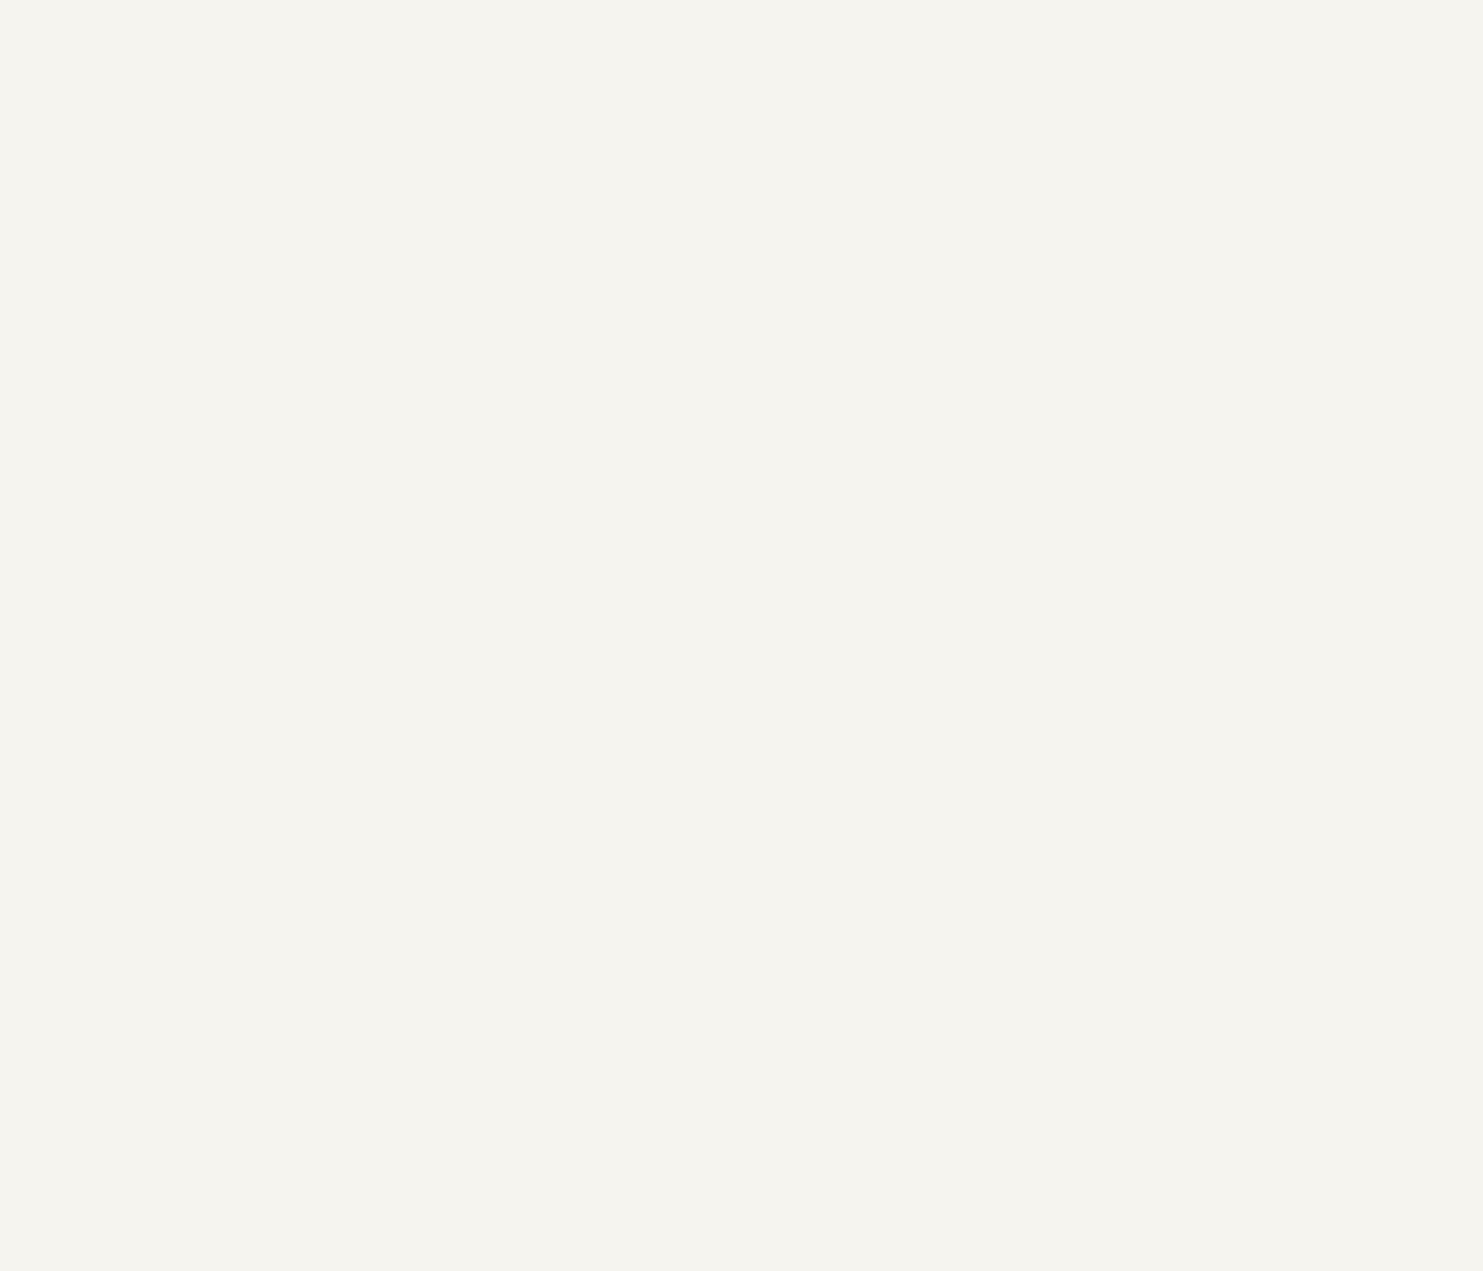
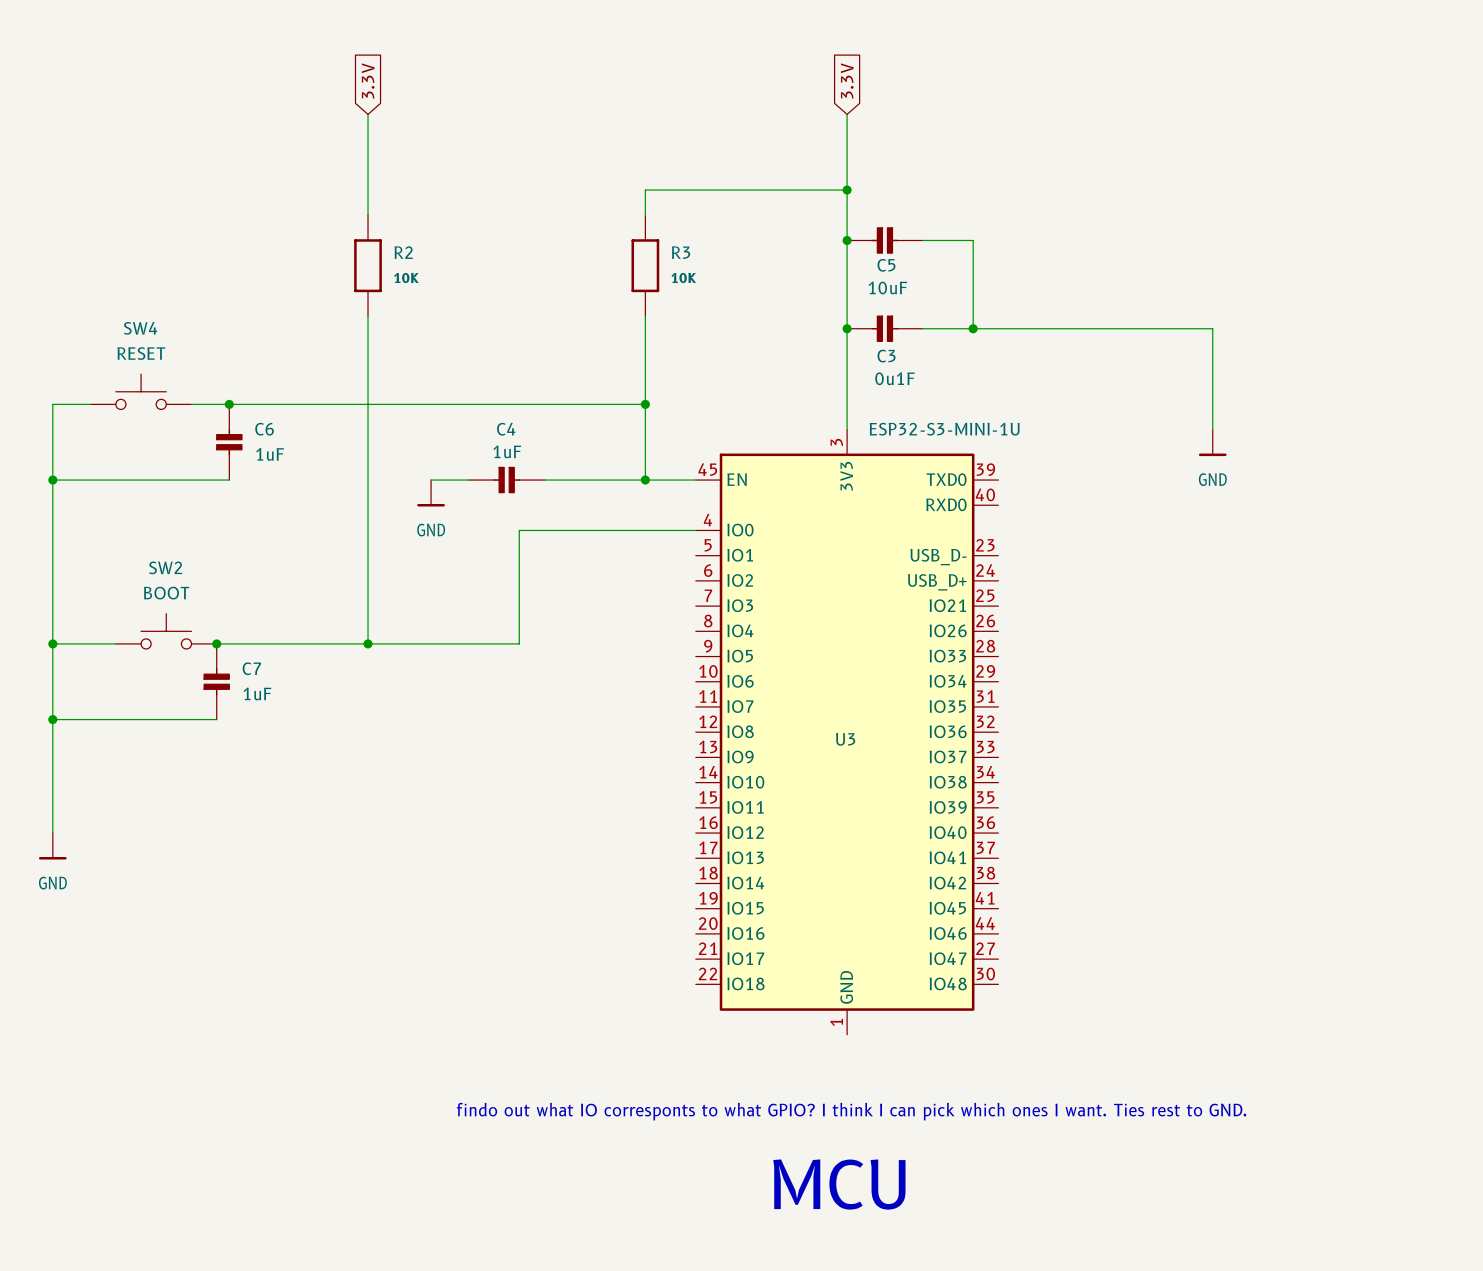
global label: none -> 3.3V (368, 80)
global label: none -> 3.3V (847, 80)
wire: none -> (368, 114) (368, 215)
wire: none -> (847, 114) (847, 429)
wire: none -> (847, 190) (645, 190) (645, 215)
junction: none -> (847, 190)
junction: none -> (847, 240)
C5: none -> 10uF (884, 240)
wire: none -> (922, 240) (973, 240) (973, 328)
R2: none -> 10K (368, 265)
R3: none -> 10K (645, 265)
wire: none -> (368, 316) (368, 643)
wire: none -> (645, 316) (645, 480)
junction: none -> (847, 328)
C3: none -> 0u1F (884, 328)
wire: none -> (922, 328) (1212, 328) (1212, 429)
junction: none -> (973, 328)
SW4: none -> RESET (141, 391)
wire: none -> (90, 404) (52, 404) (52, 833)
wire: none -> (191, 404) (645, 404)
junction: none -> (229, 404)
junction: none -> (645, 404)
C6: none -> 1uF (229, 442)
power symbol: none -> GND (1212, 442)
wire: none -> (52, 480) (229, 480)
junction: none -> (52, 480)
wire: none -> (431, 480) (468, 480)
C4: none -> 1uF (506, 480)
wire: none -> (544, 480) (695, 480)
junction: none -> (645, 480)
power symbol: none -> GND (431, 493)
wire: none -> (695, 530) (519, 530) (519, 643) (216, 643)
SW2: none -> BOOT (166, 631)
wire: none -> (52, 643) (115, 643)
junction: none -> (52, 643)
junction: none -> (216, 643)
junction: none -> (368, 643)
C7: none -> 1uF (216, 681)
wire: none -> (52, 719) (216, 719)
junction: none -> (52, 719)
U3: none -> ESP32-S3-MINI-1U (847, 732)
power symbol: none -> GND (52, 846)
text: none -> findo out what IO corresponts to what GPIO? I think I can pick which ones I want. Ties rest to GND. (851, 1111)
text: none -> MCU (839, 1184)

